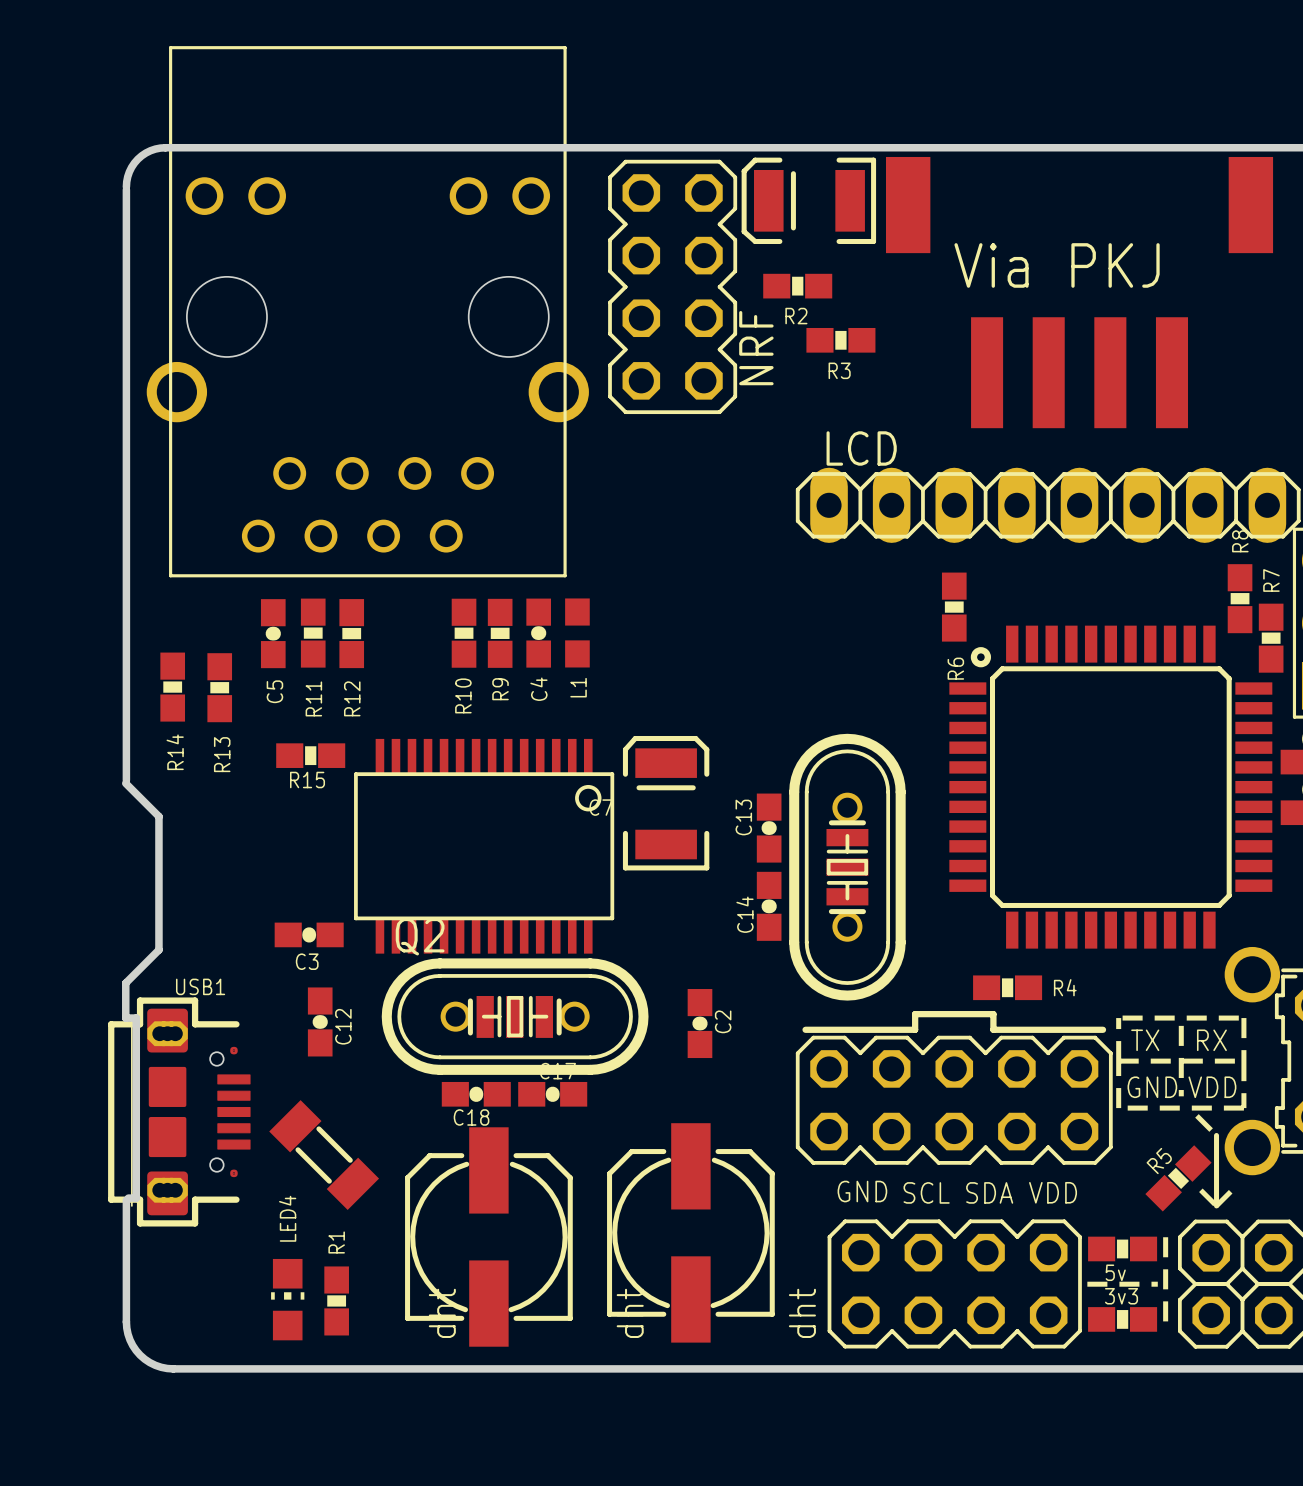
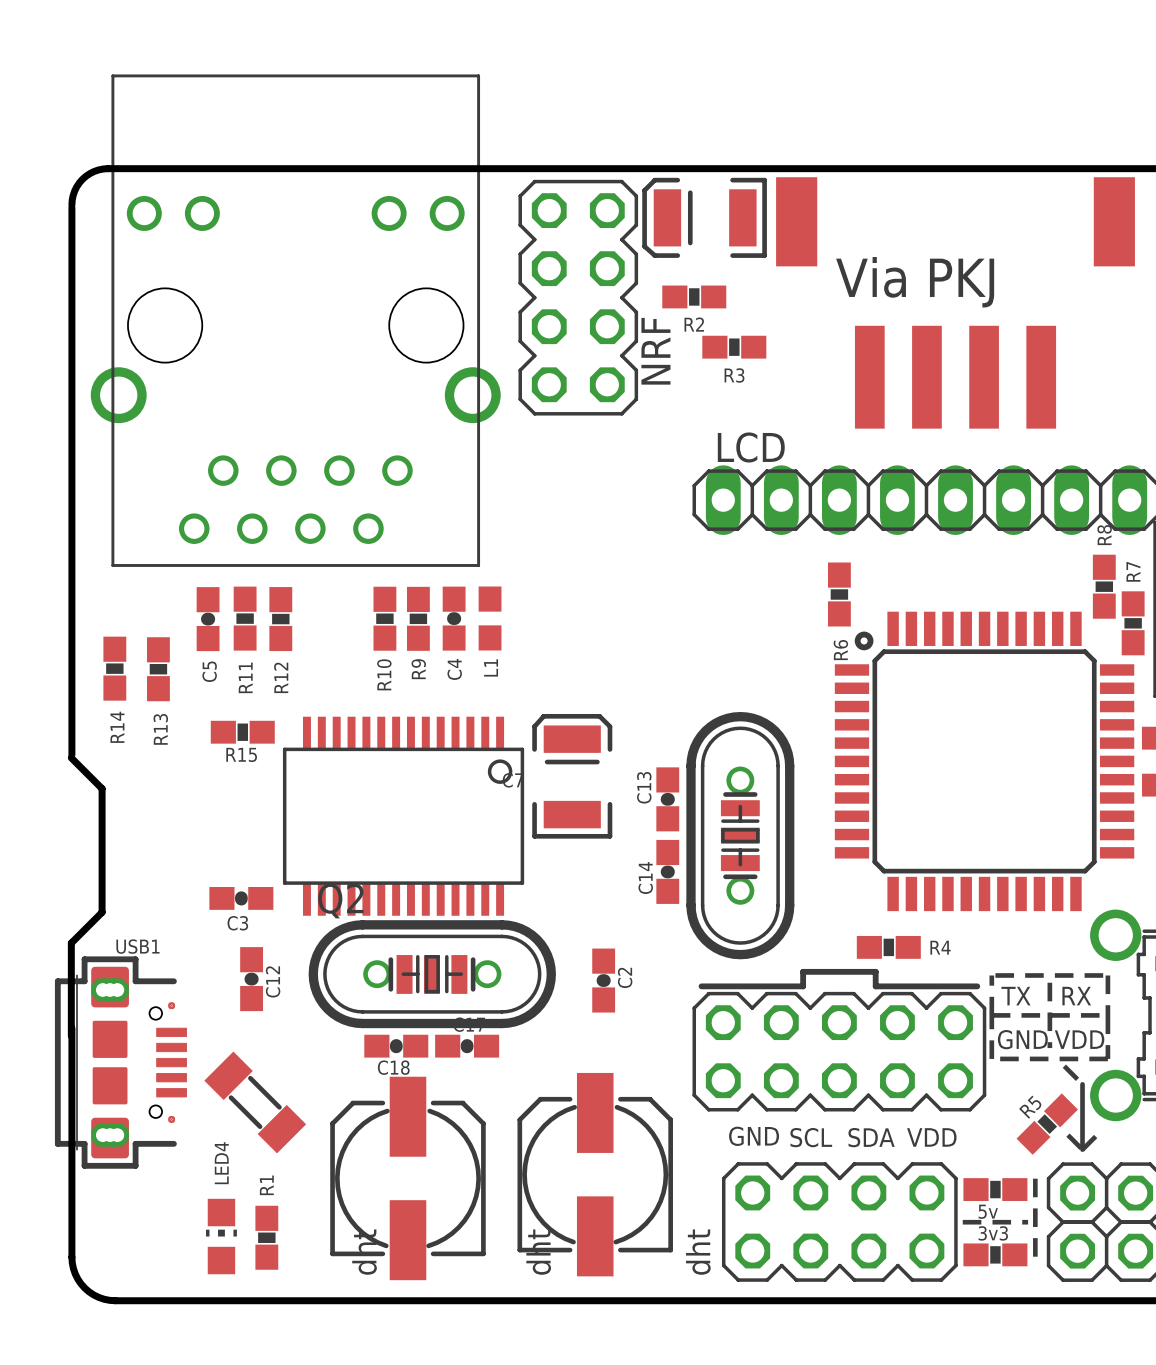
board edge: (125, 1018) (136, 1018) (136, 1198) (128, 1198) -> (71, 975) (71, 1036)
board edge: none -> (71, 1028) (71, 1144)

